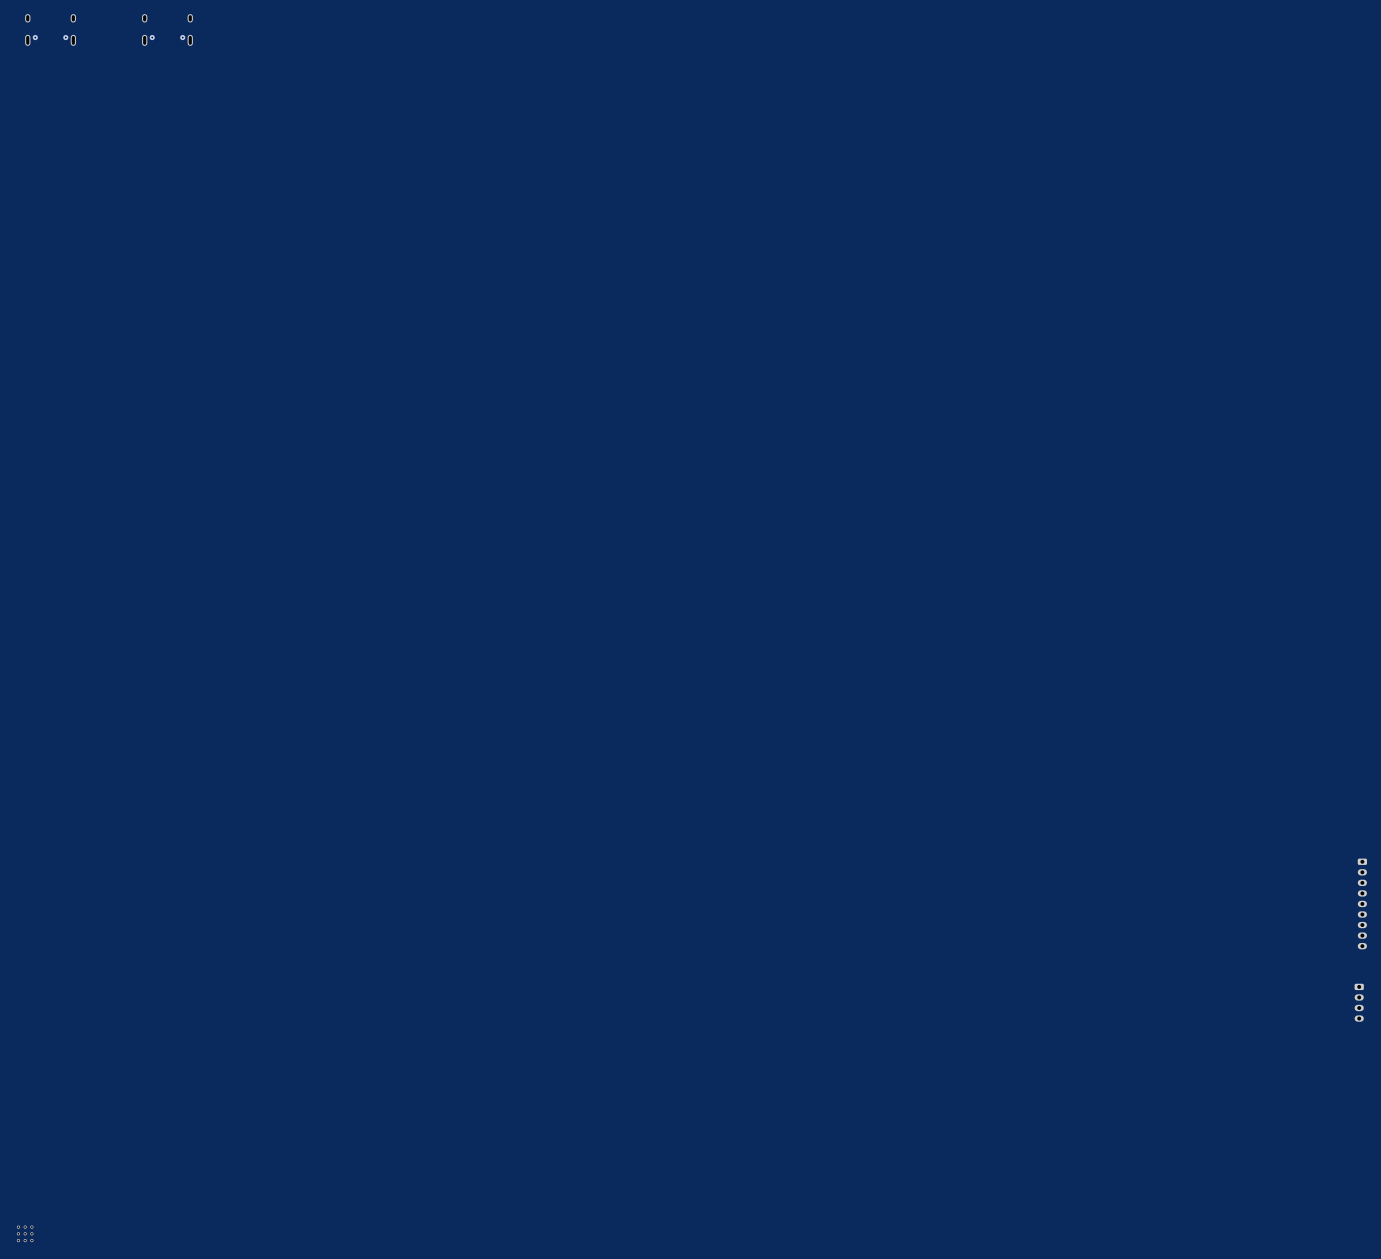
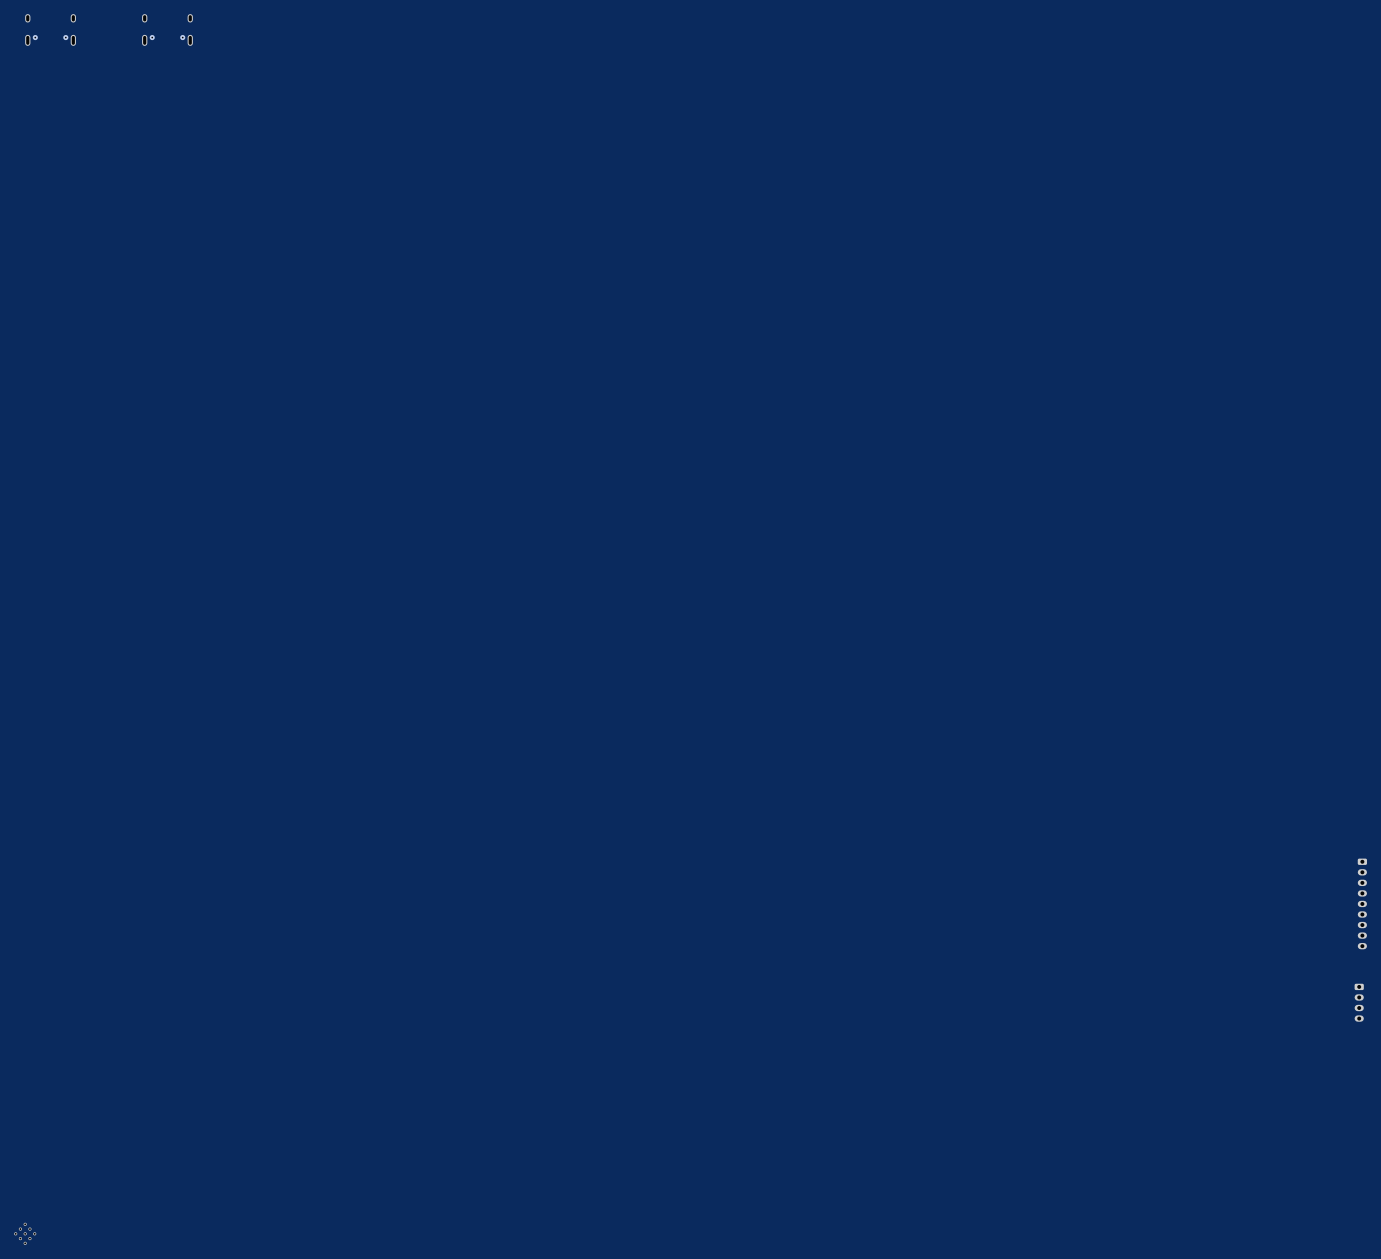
part rotation: 0° (25, 1233) -> 45° clockwise (25, 1233)

